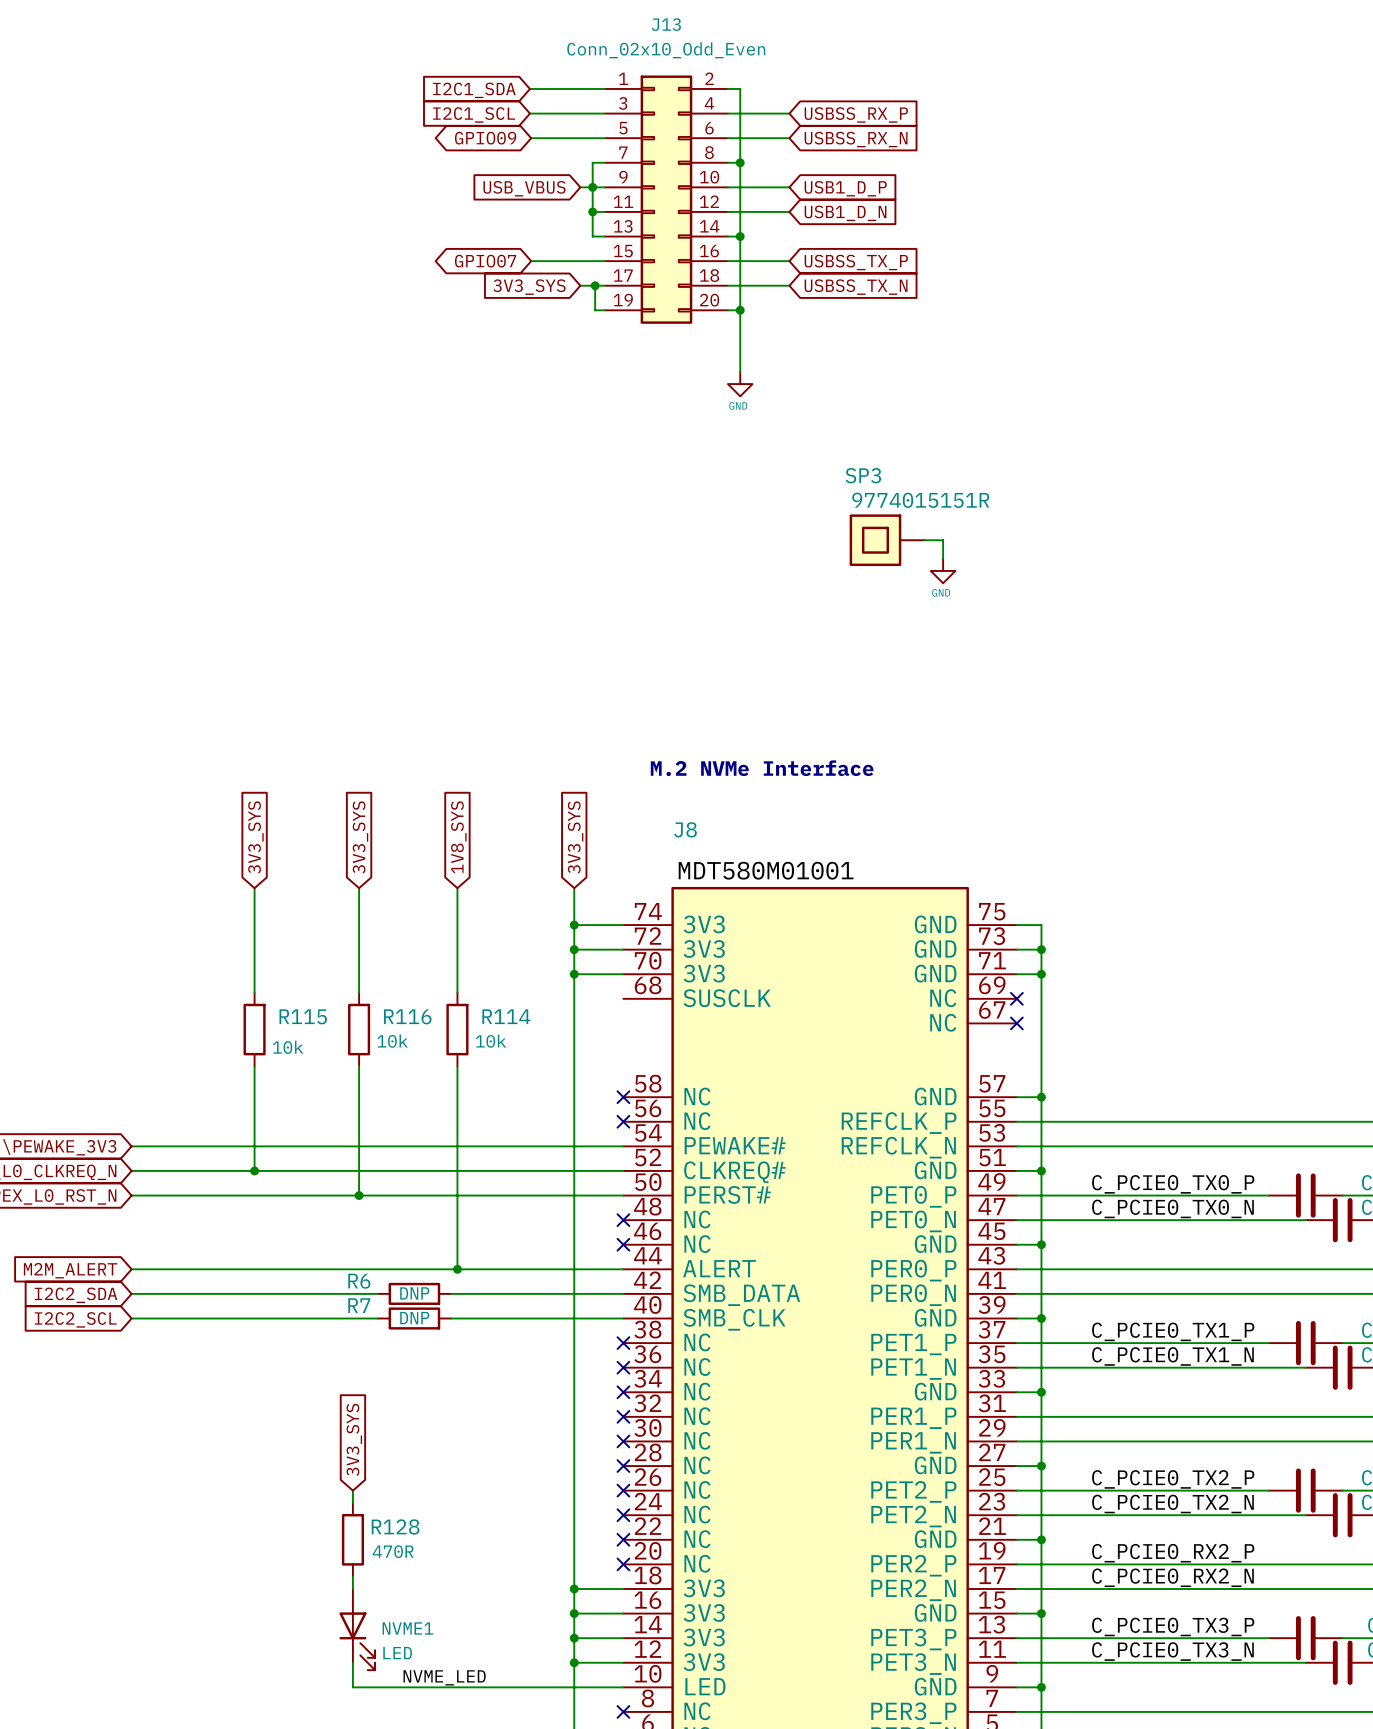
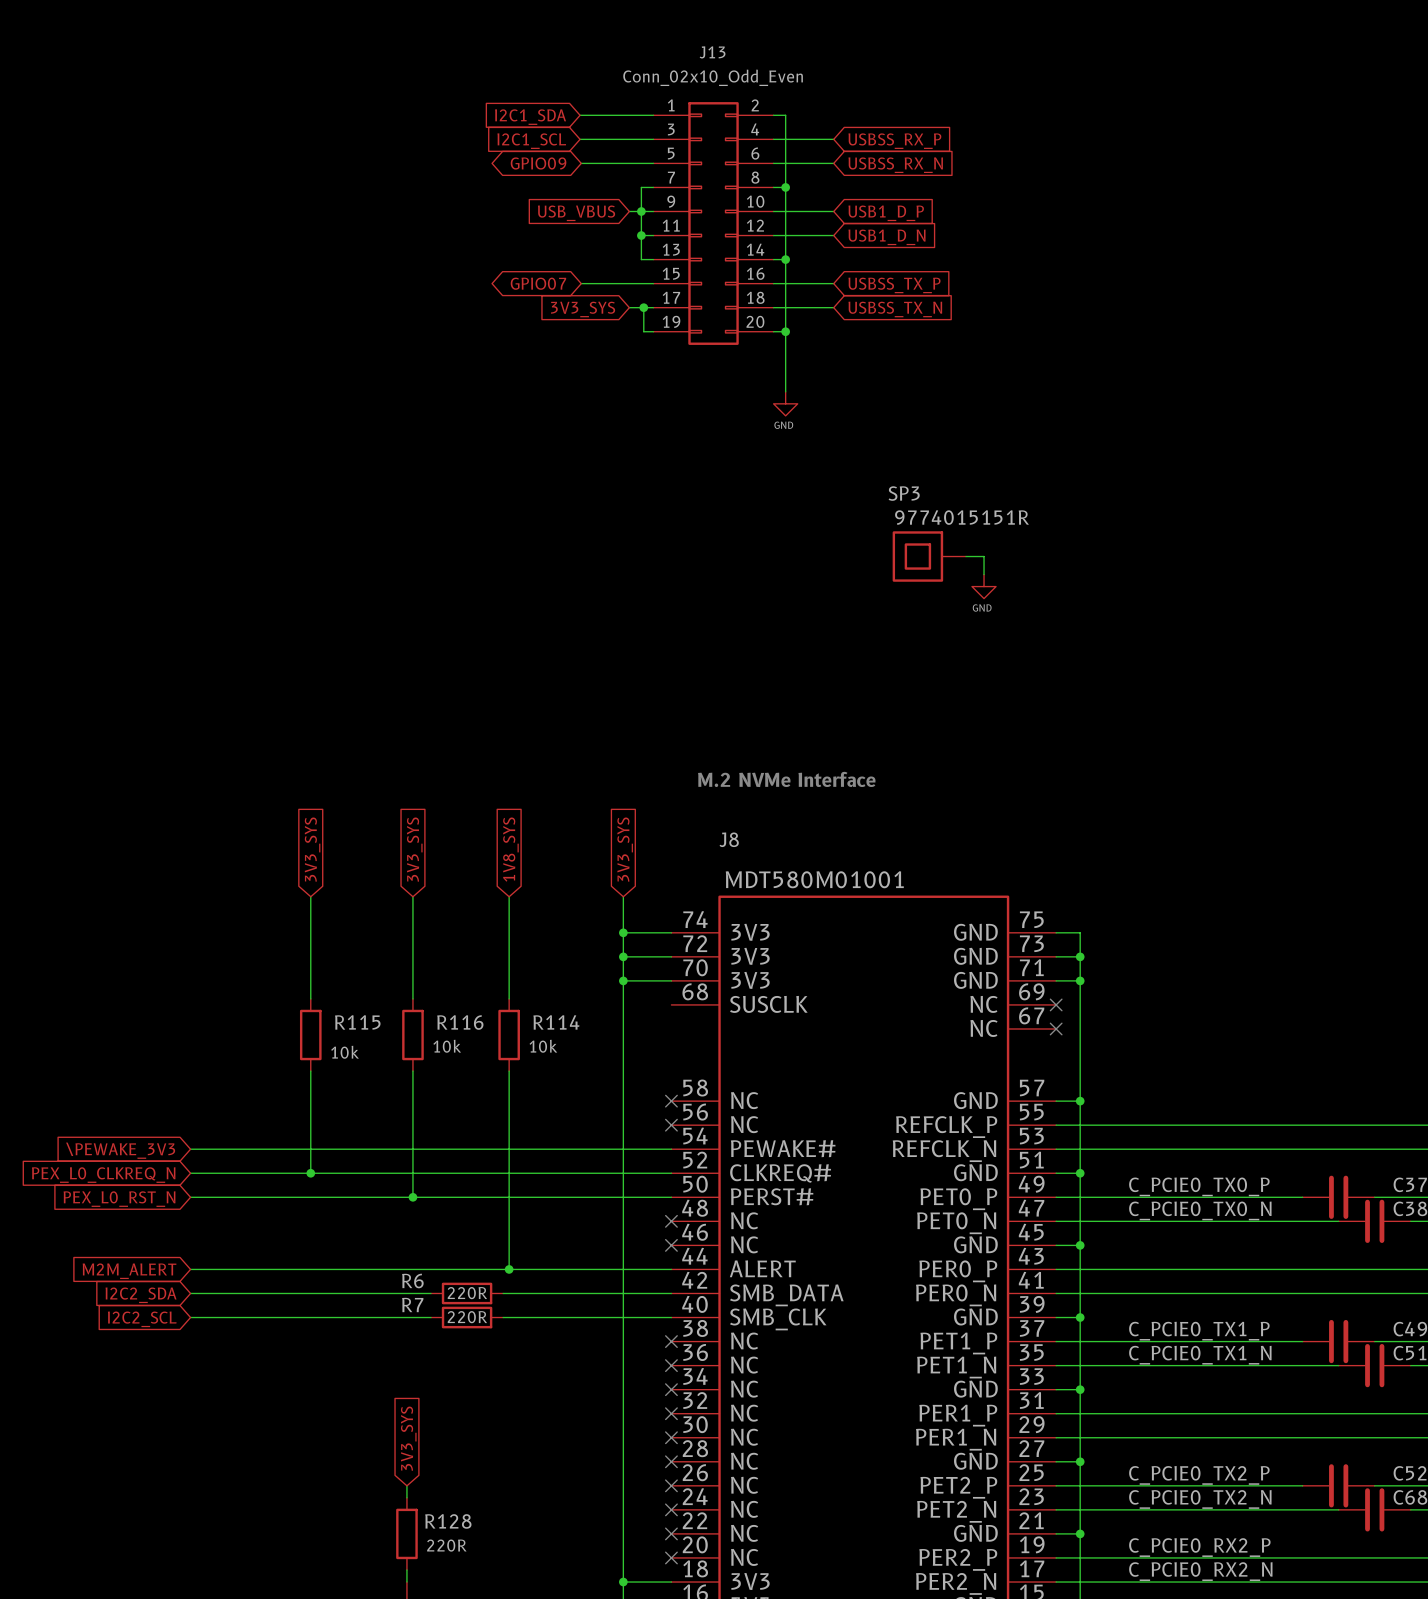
R6 text: DNP (414, 1293) -> 220R (467, 1293)
R7 text: DNP (414, 1318) -> 220R (467, 1317)
R128 text: 470R (393, 1551) -> 220R (446, 1545)

